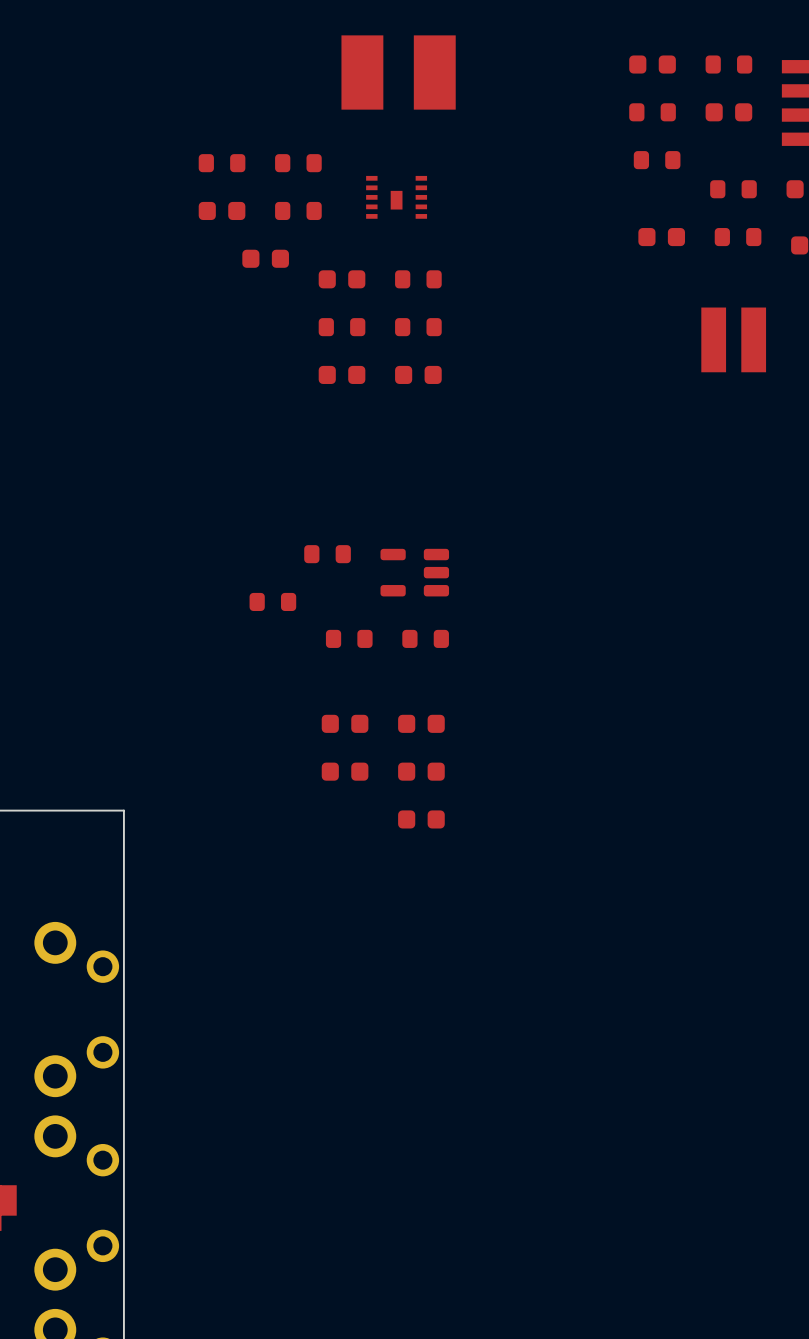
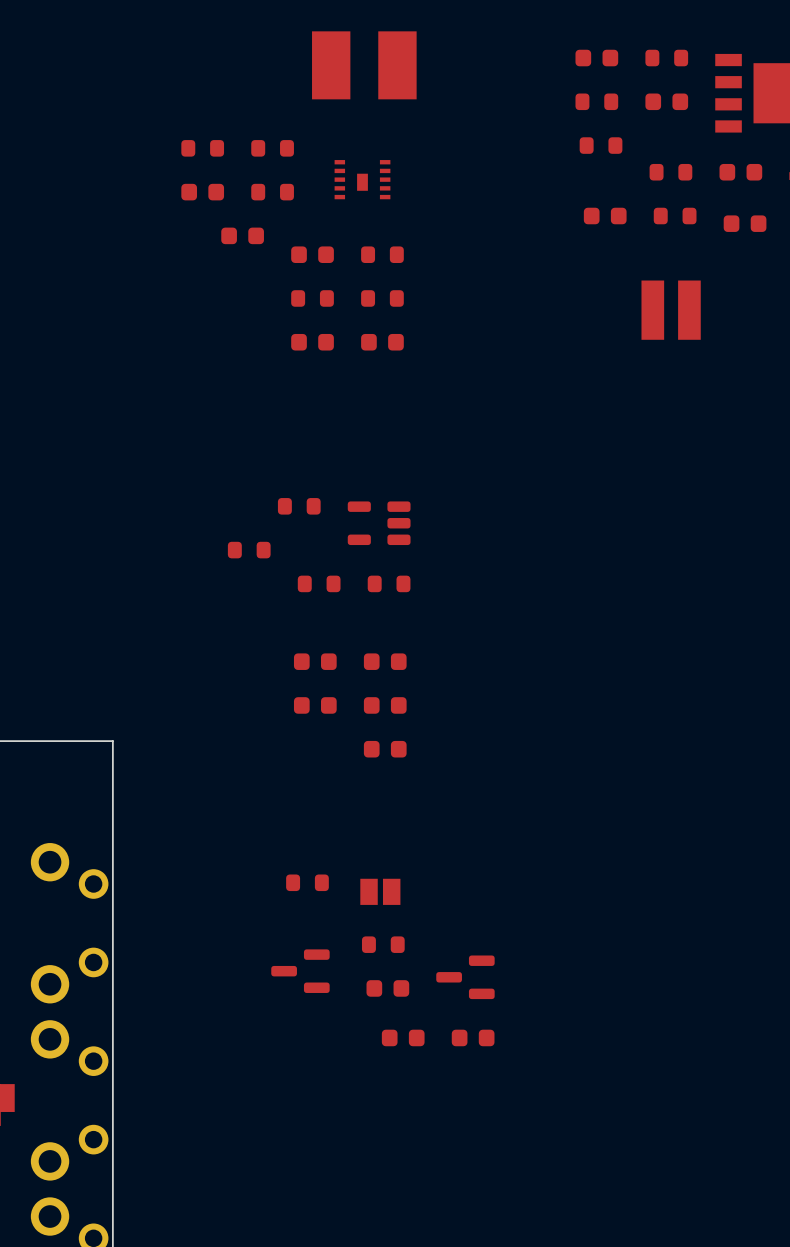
part: none -> (307, 882)
part: none -> (380, 891)
part: none -> (383, 944)
part: none -> (300, 971)
part: none -> (465, 977)
part: none -> (387, 988)
part: none -> (403, 1037)
part: none -> (473, 1037)

